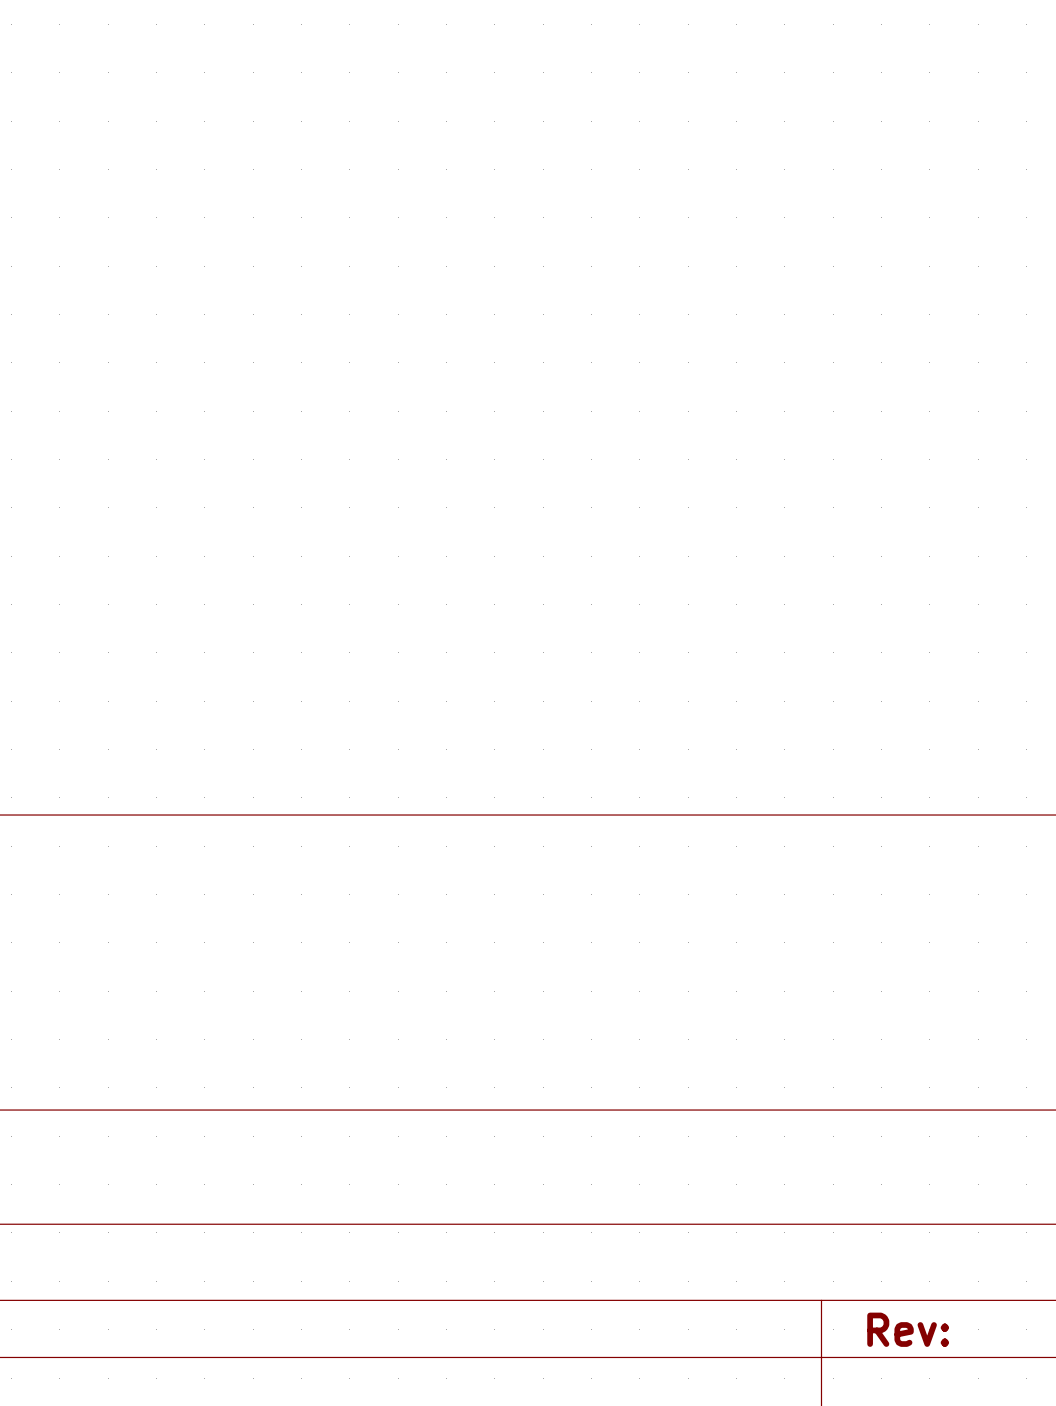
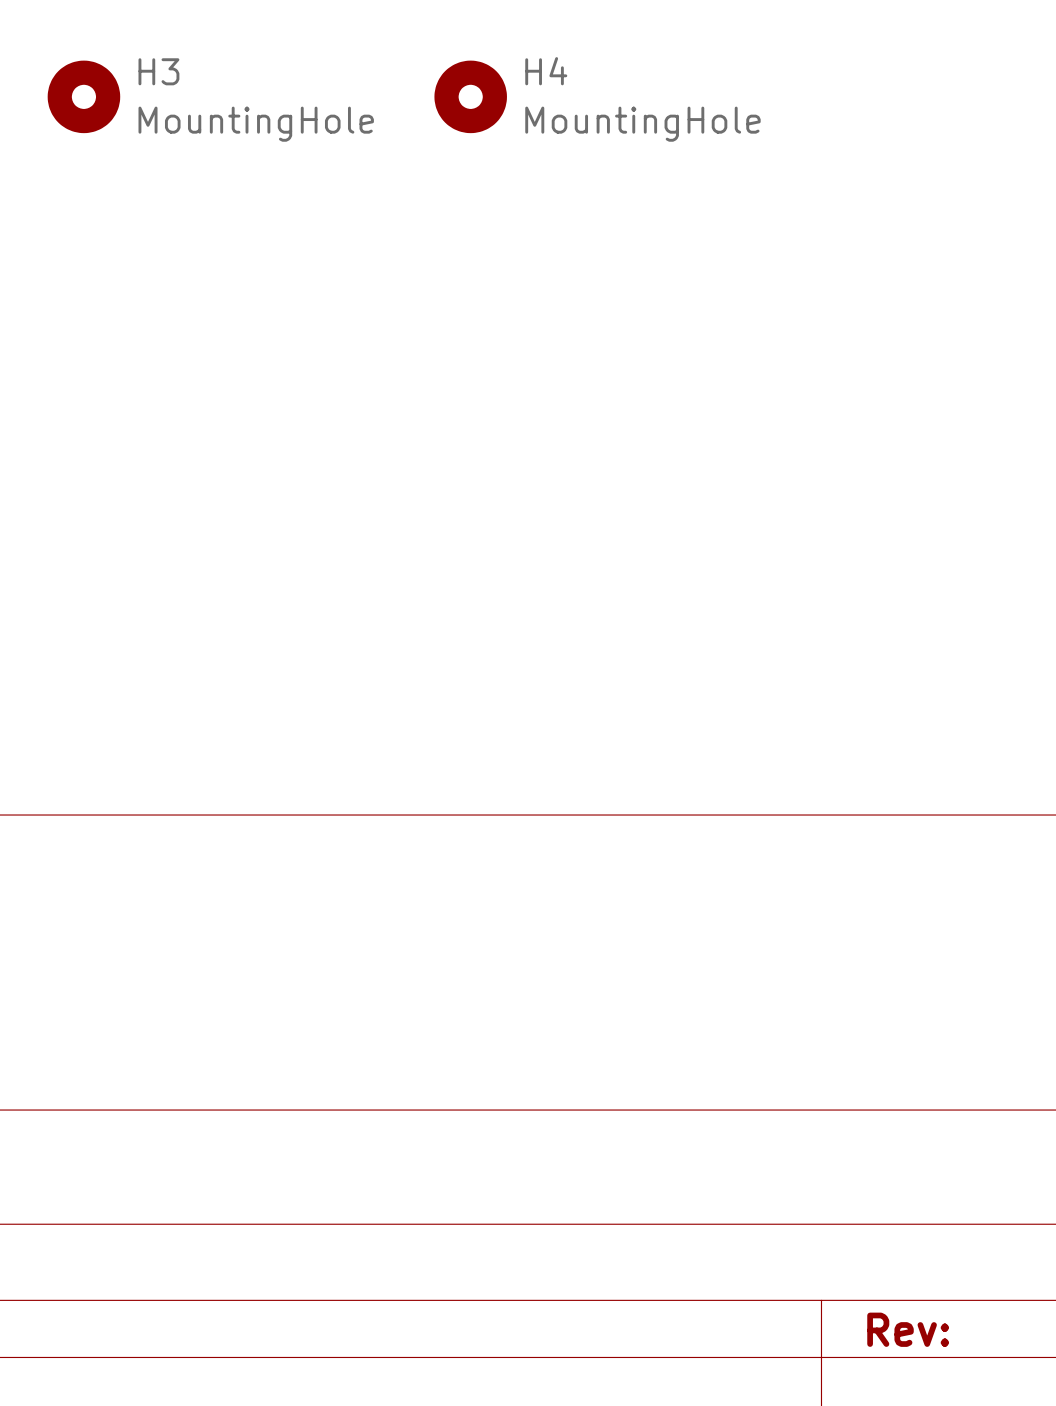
H3: none -> MountingHole (83, 96)
H4: none -> MountingHole (470, 96)

